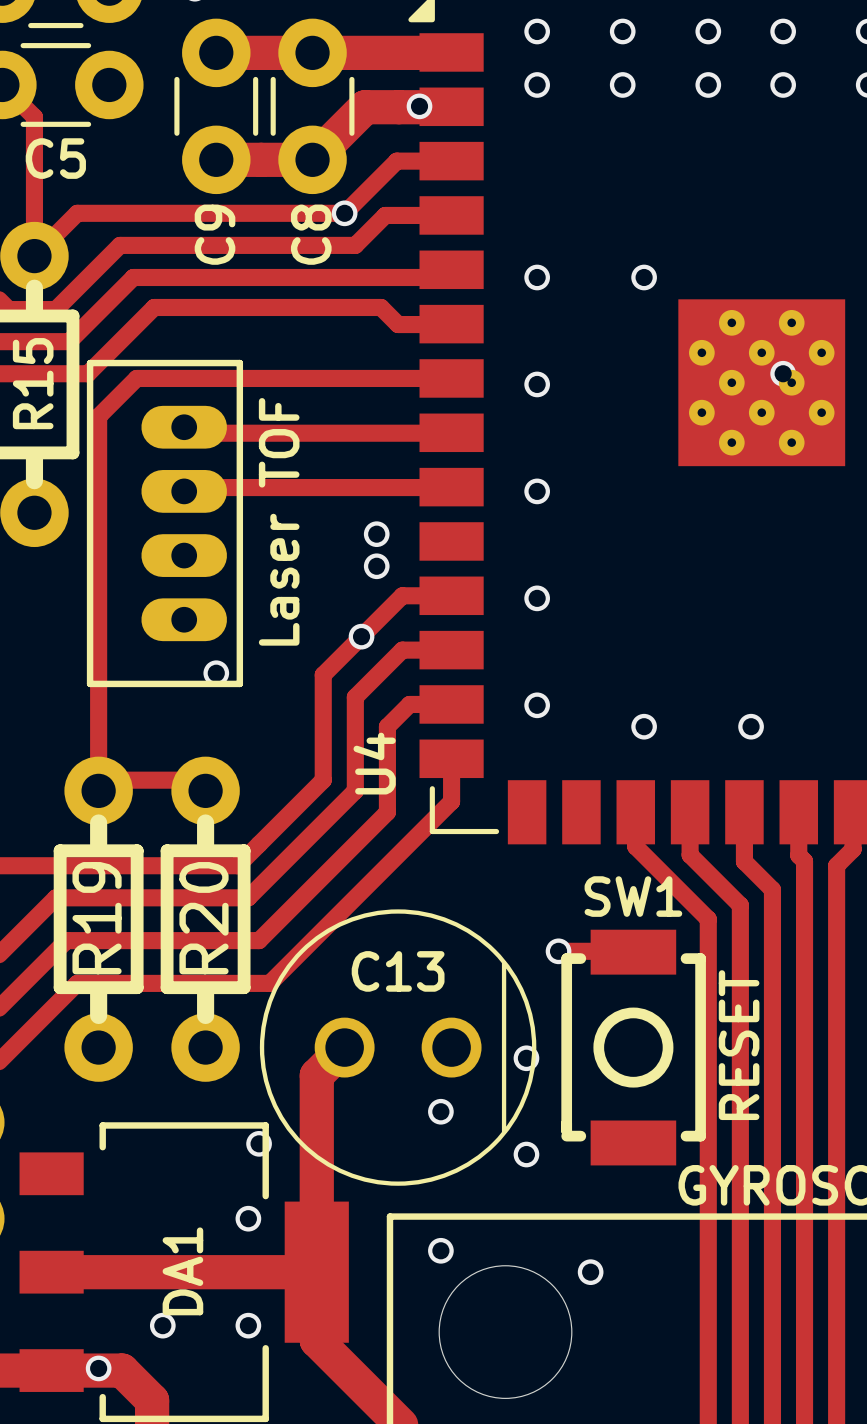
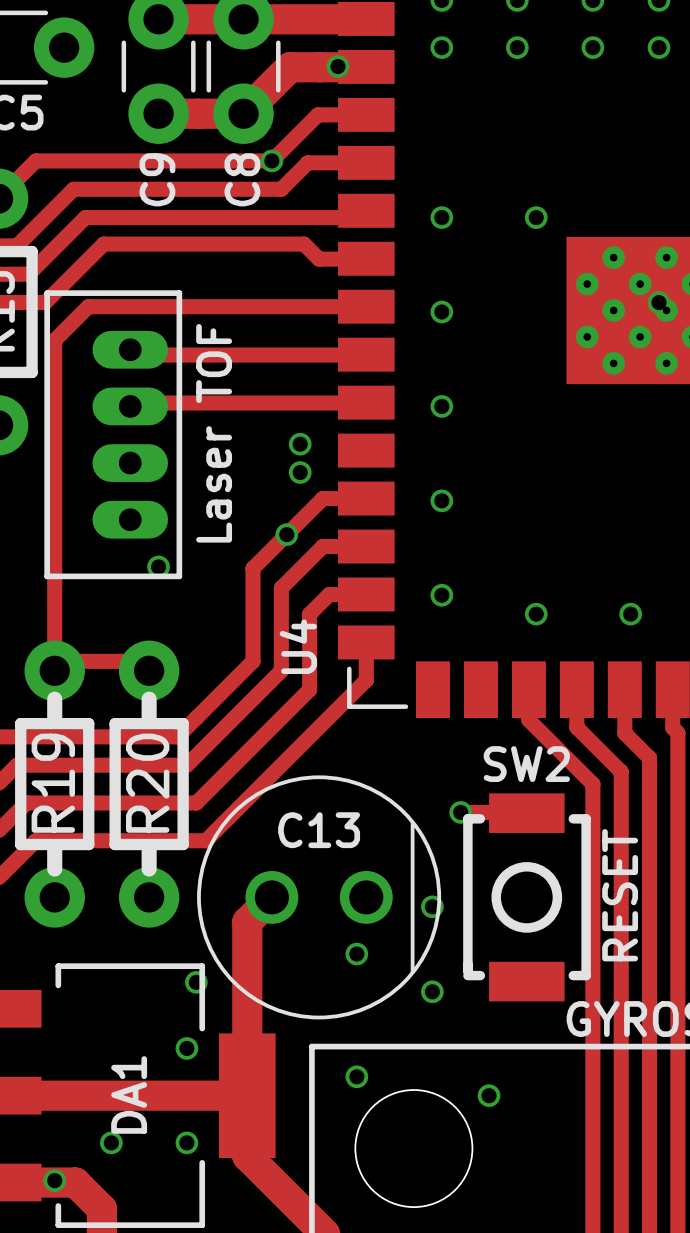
SW1 name: SW1 (633, 896) -> SW2 (526, 764)

